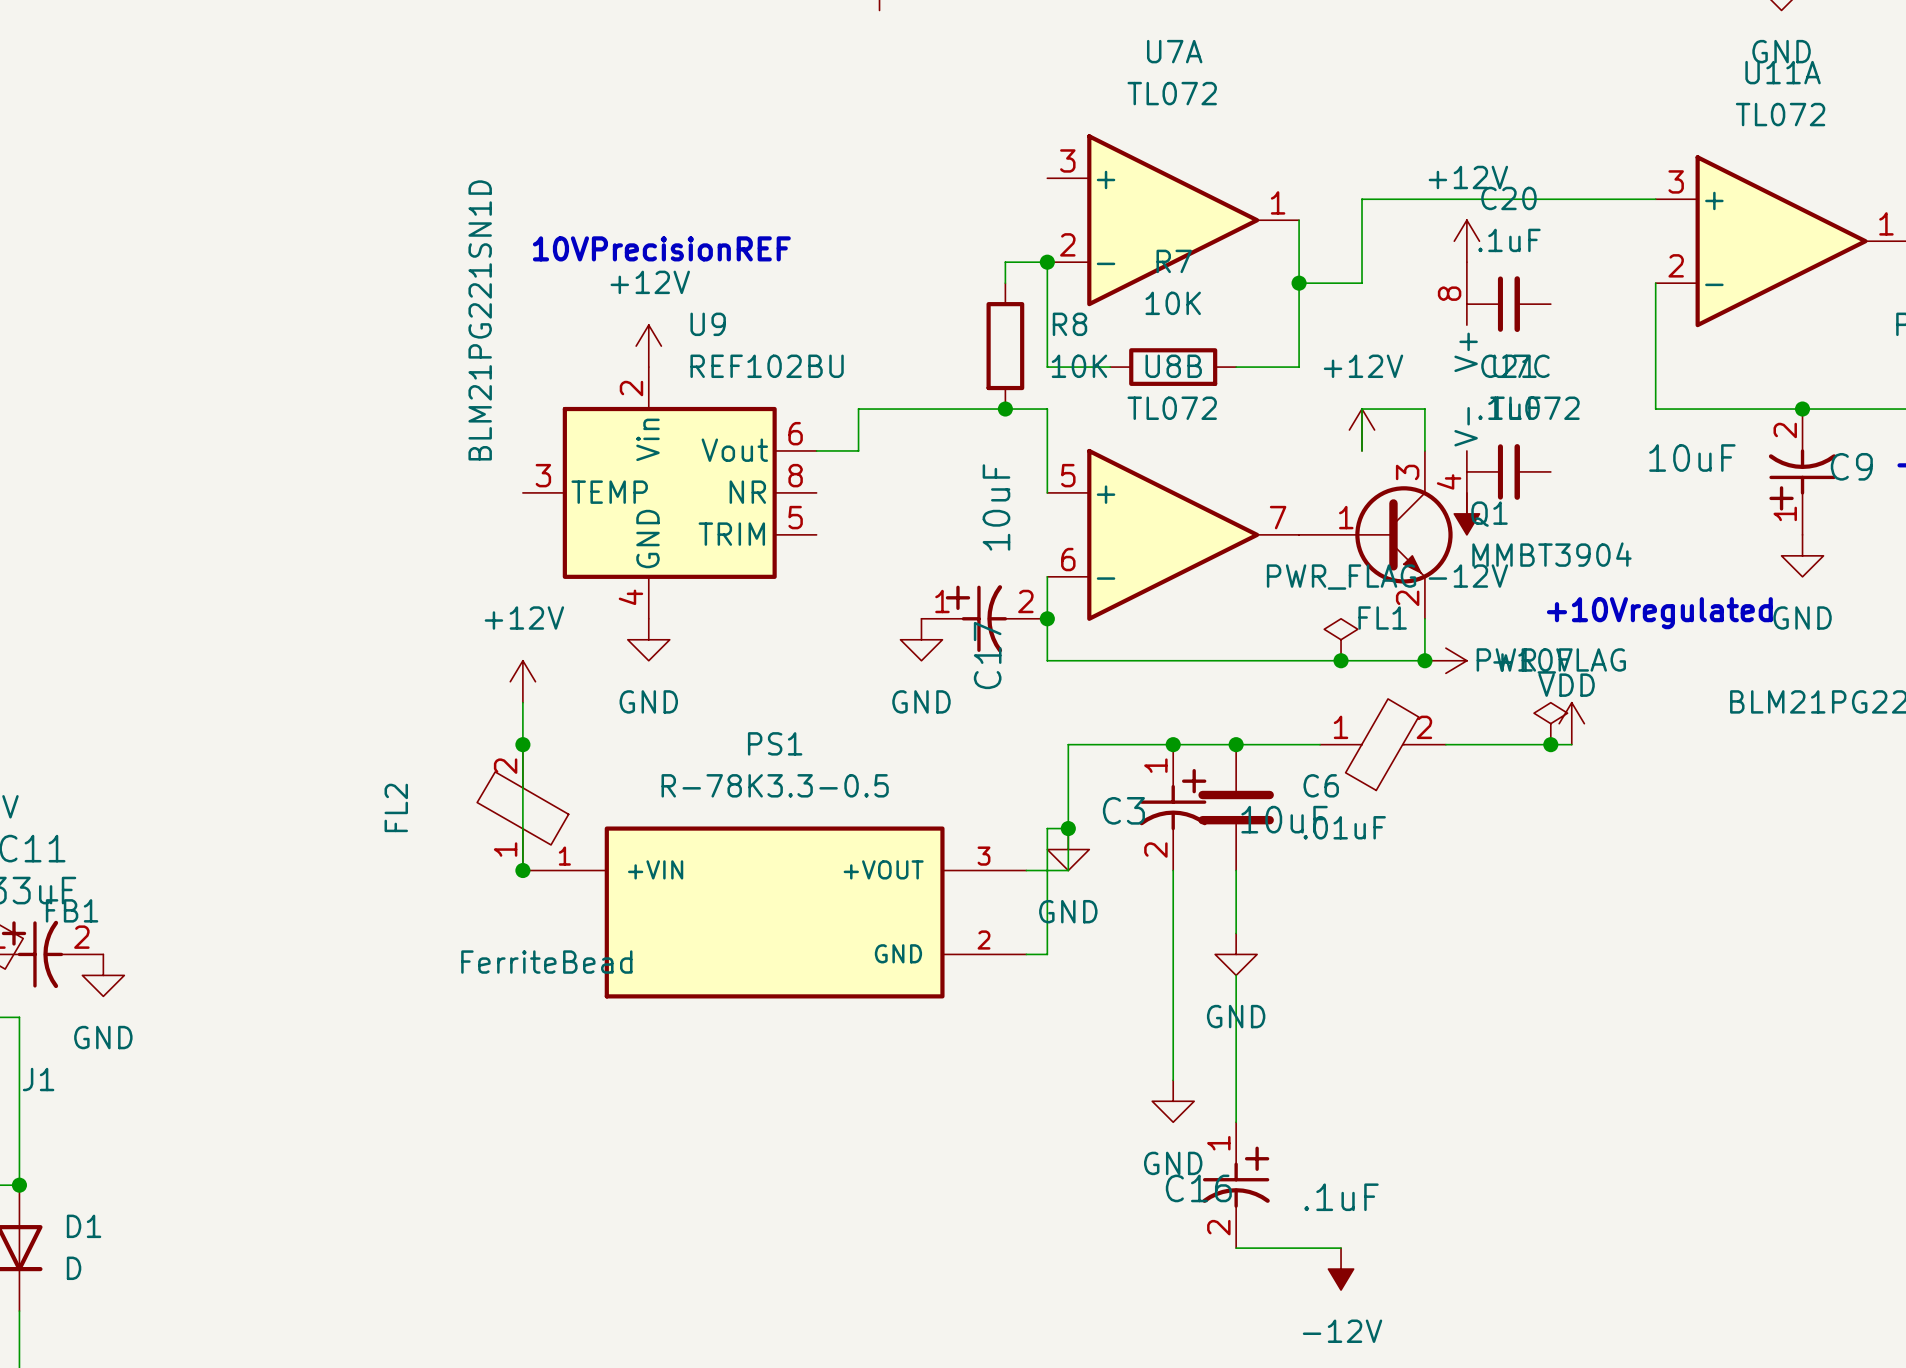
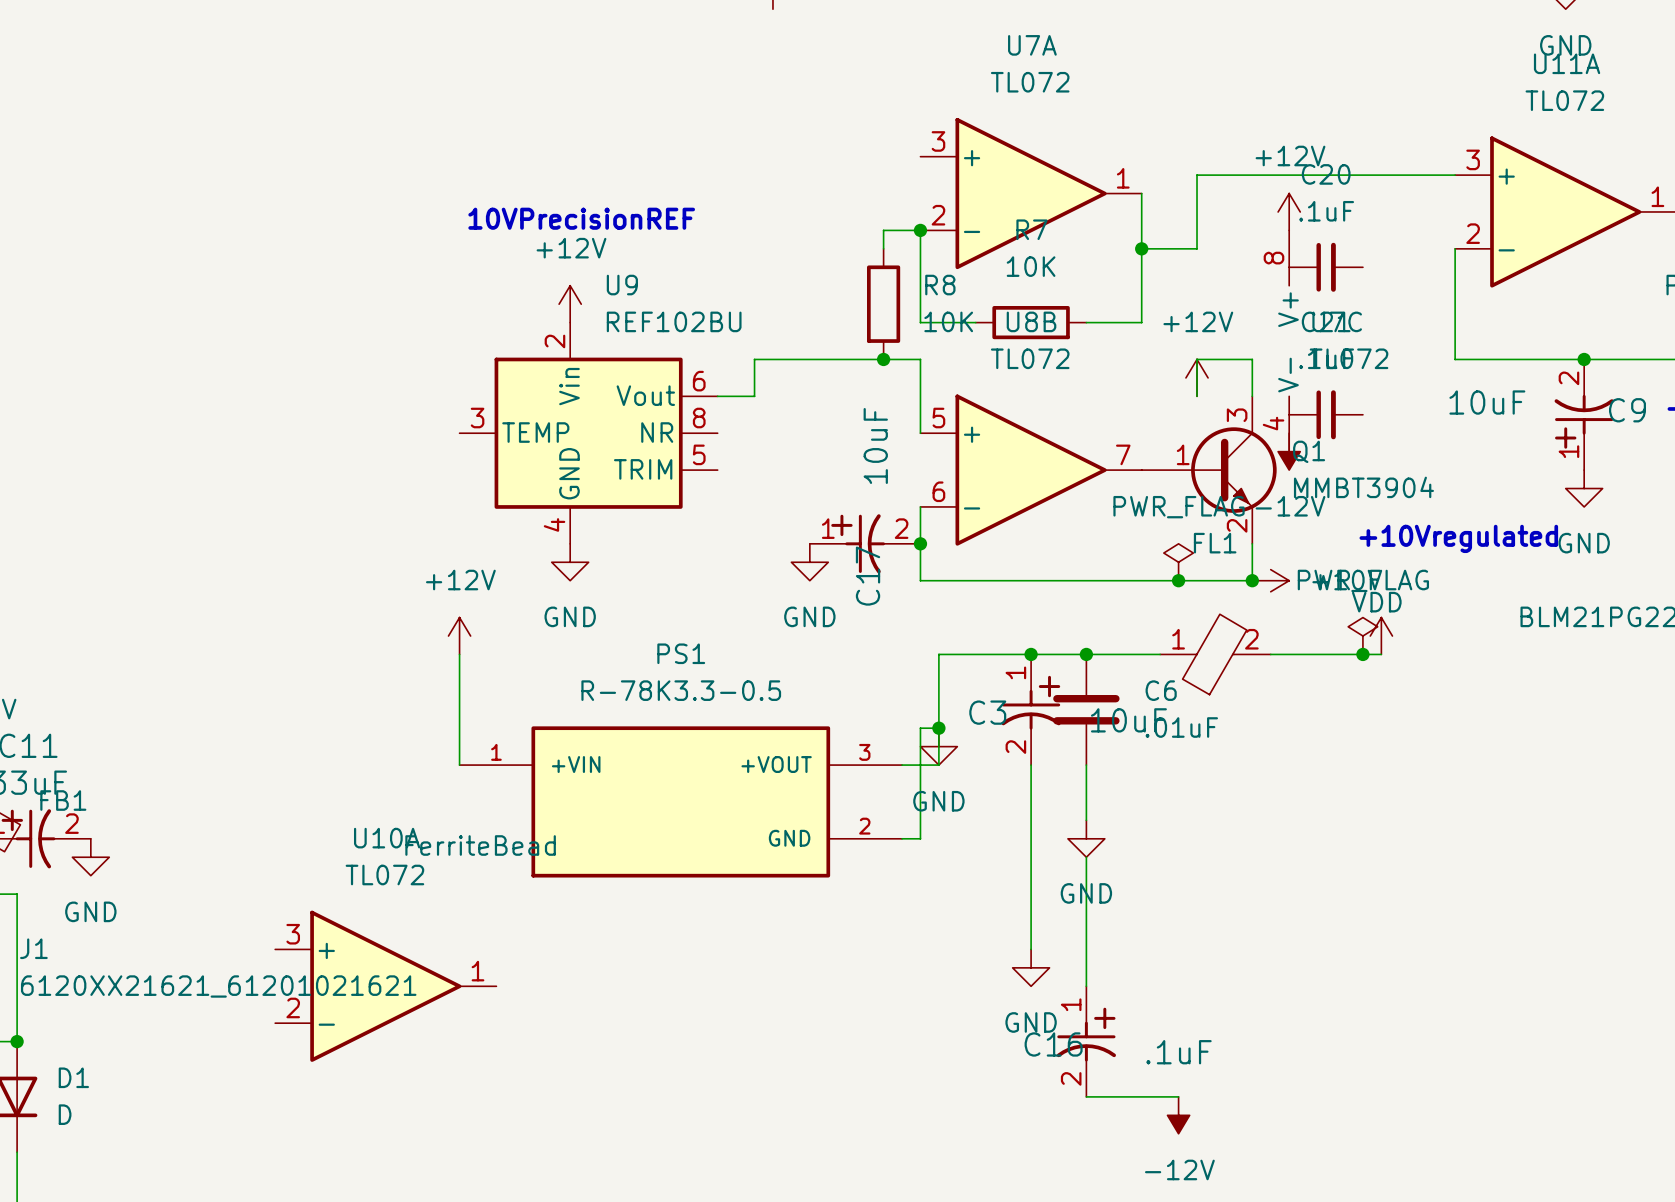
power symbol position: +12V (522, 681) -> +12V (459, 636)
junction: (522, 744) -> none
FL2: BLM21PG221SN1D (522, 807) -> none
junction: (522, 870) -> none
J1 value: none -> 6120XX21621_61201021621 (218, 986)
U10A: none -> TL072 (385, 986)

